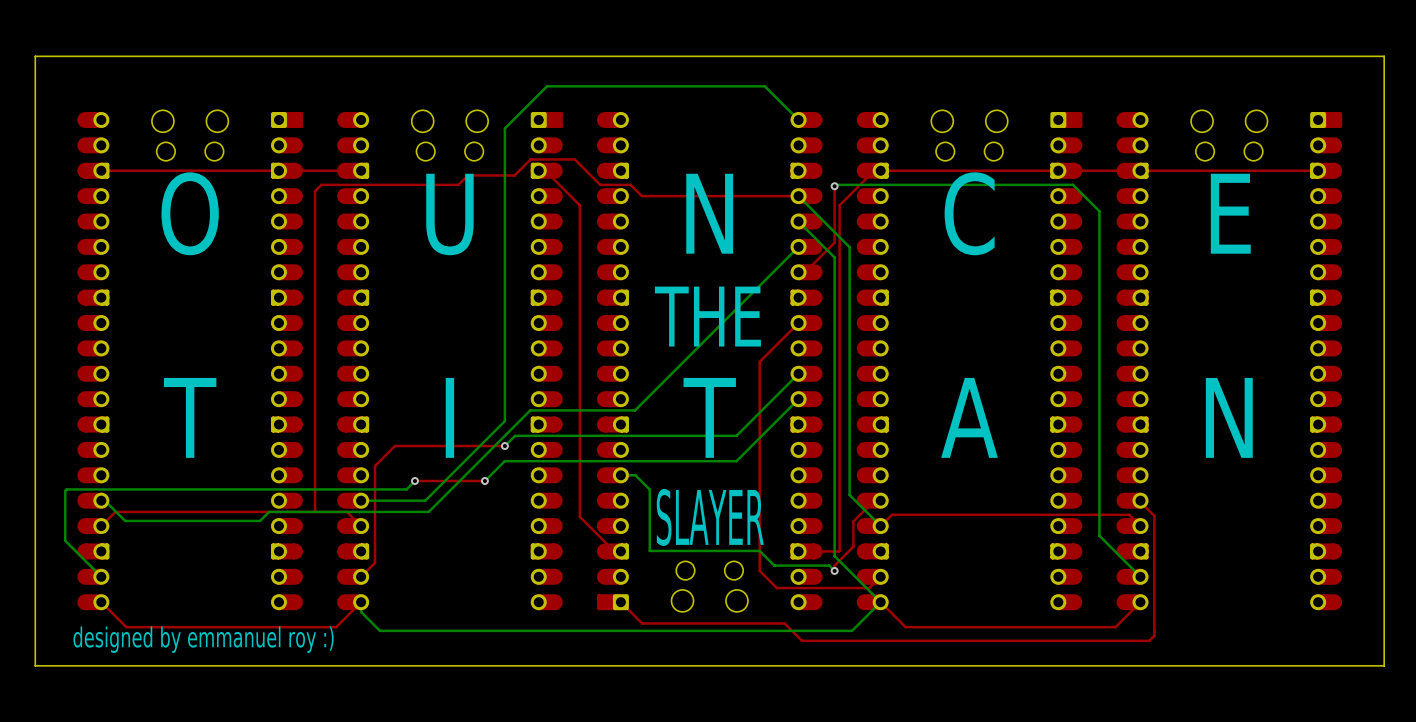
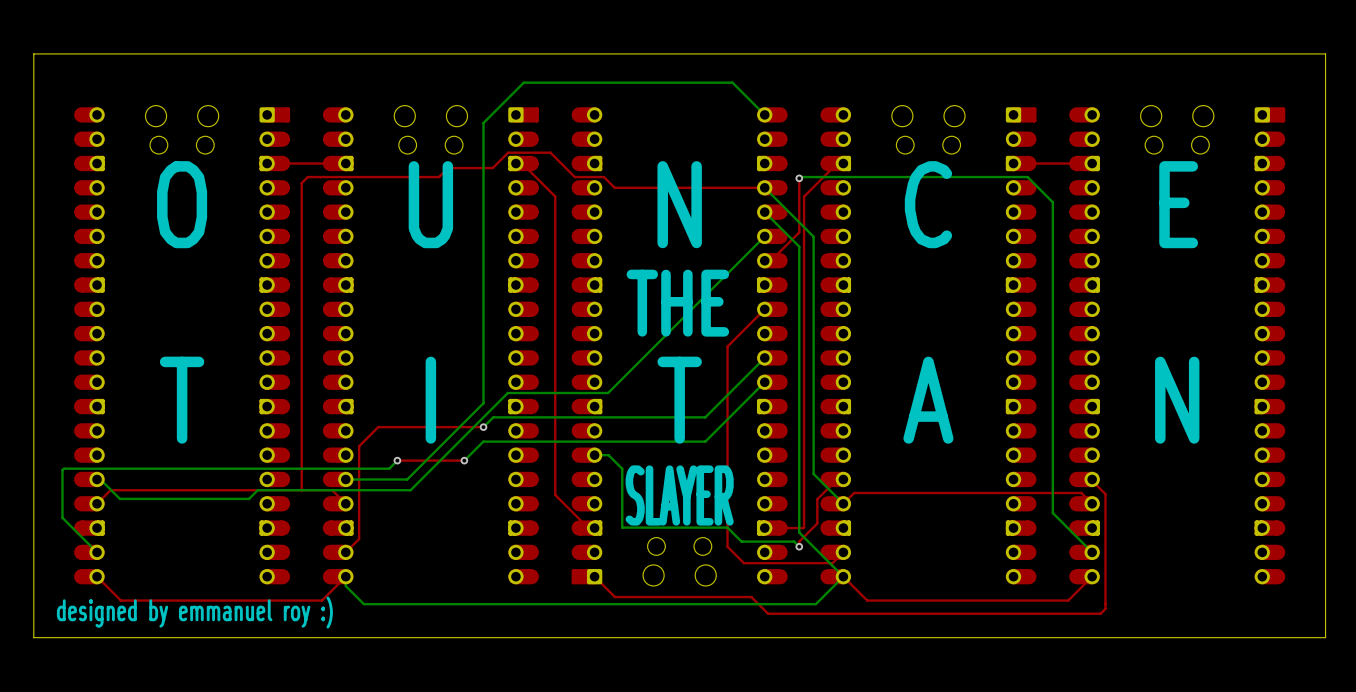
top track: (278, 170) (101, 170) -> none
top track: (1058, 170) (880, 170) -> none
top track: (1318, 170) (1140, 170) -> none

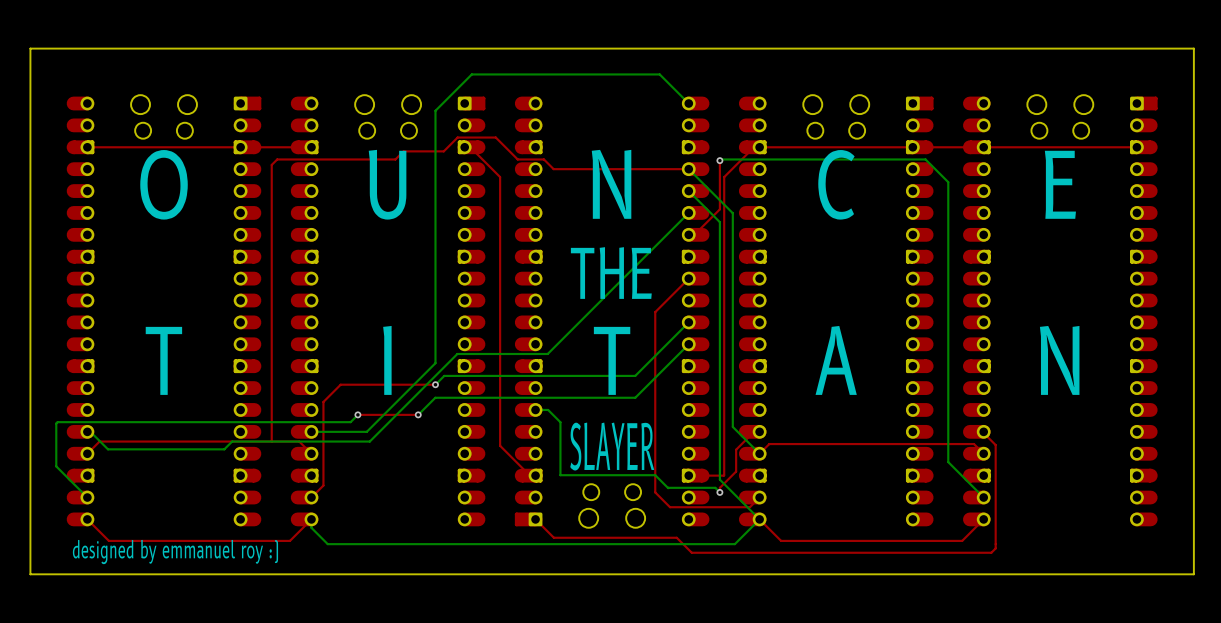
top track: none -> (240, 147) (87, 147)
top track: none -> (912, 147) (759, 147)
top track: none -> (1136, 147) (983, 147)

